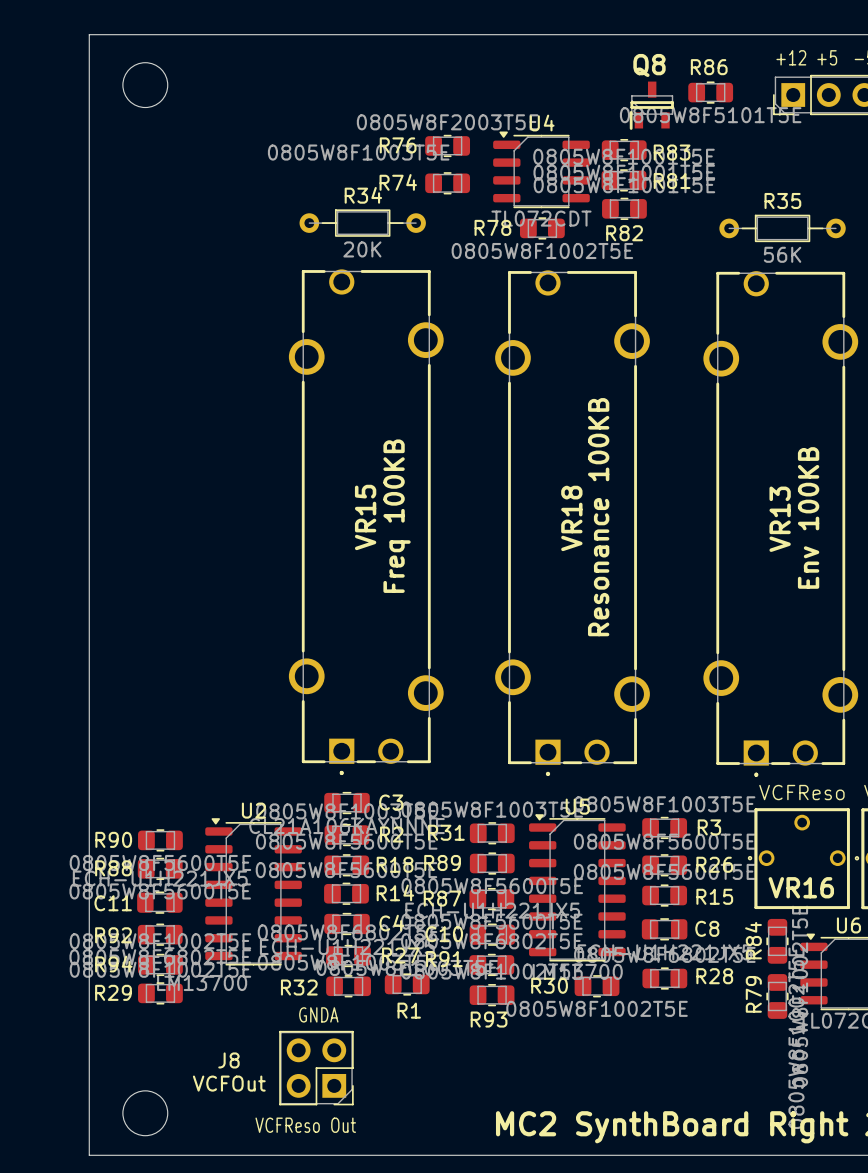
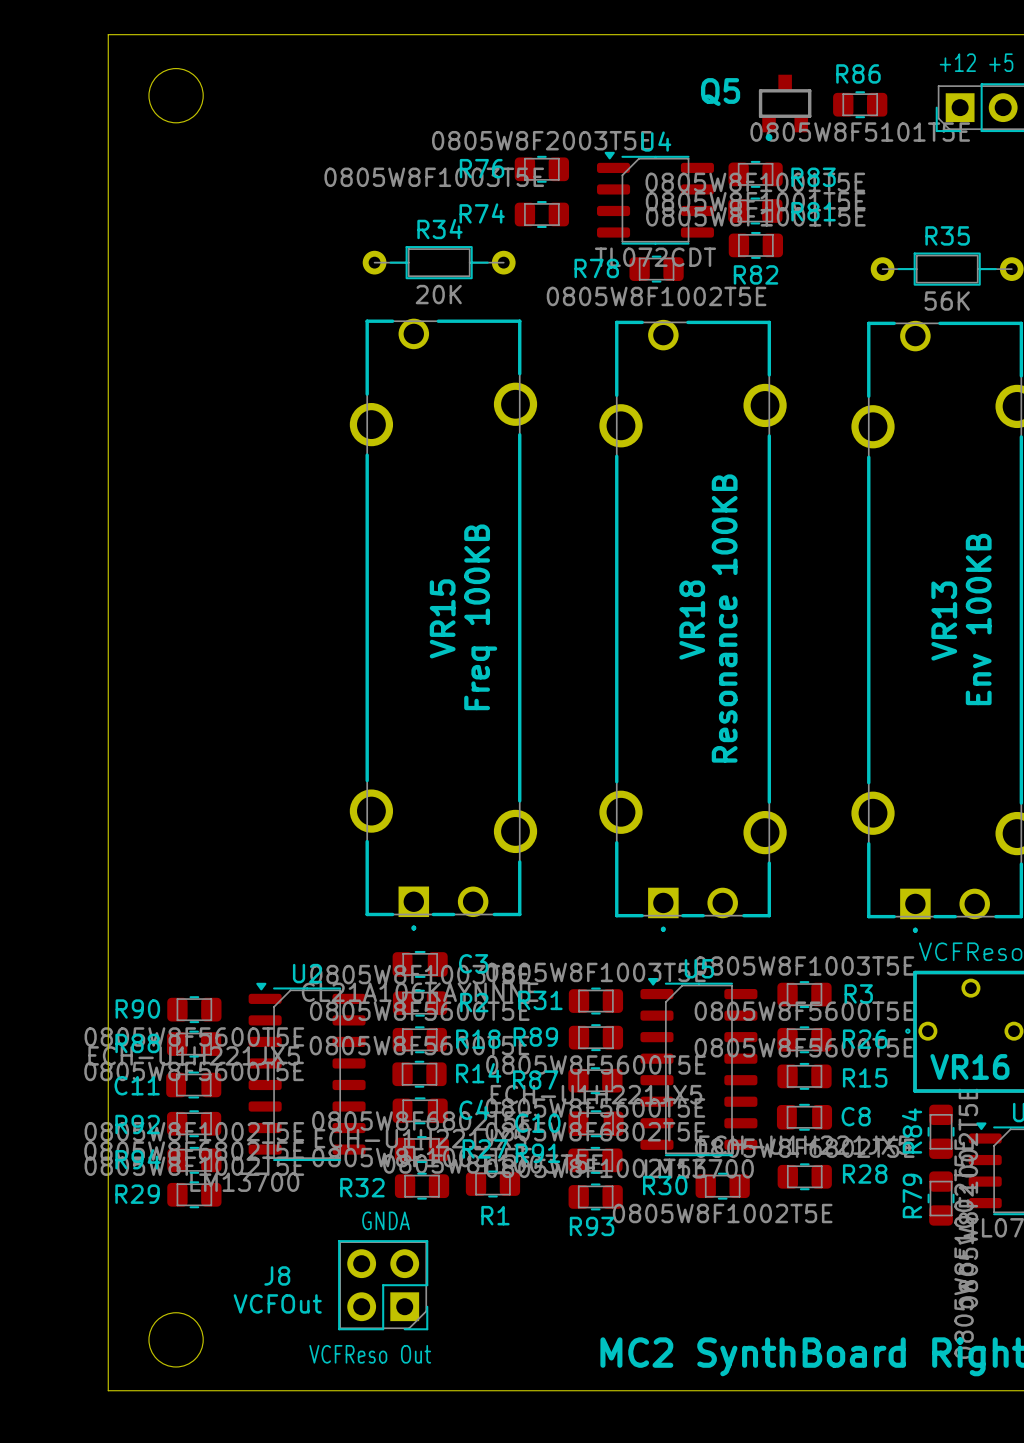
Q5: none -> (785, 107)
Q8: (651, 105) -> none

